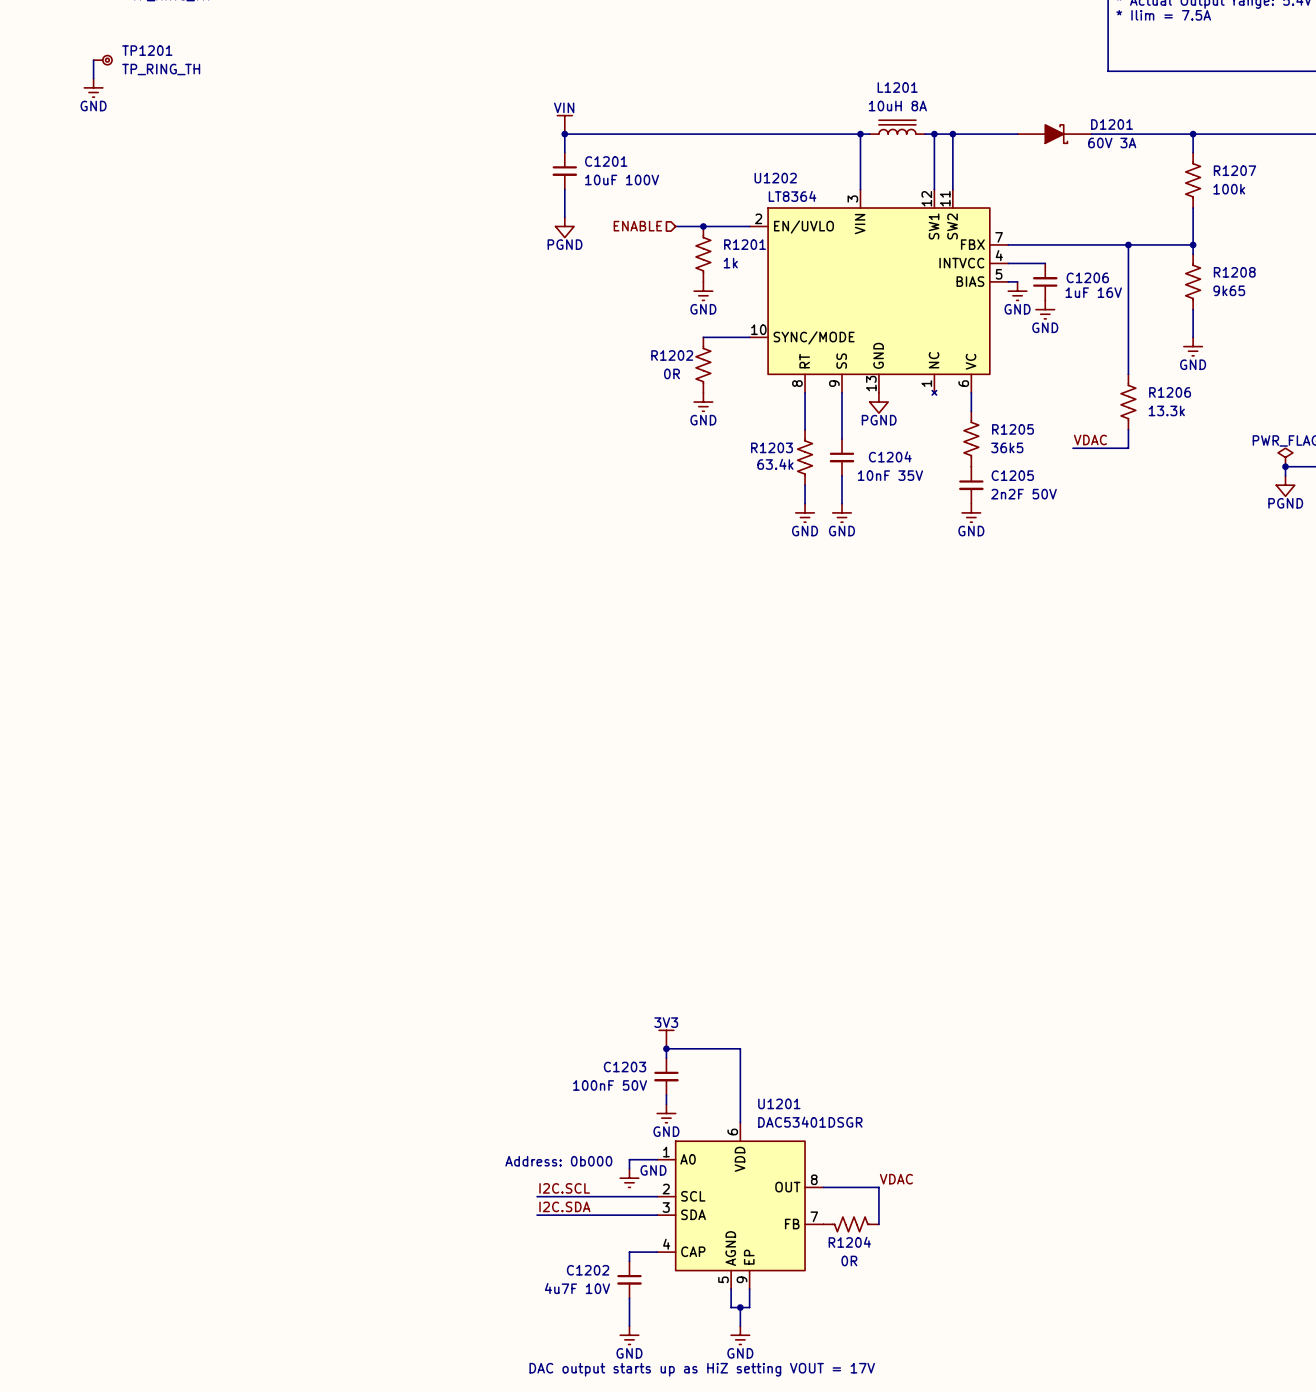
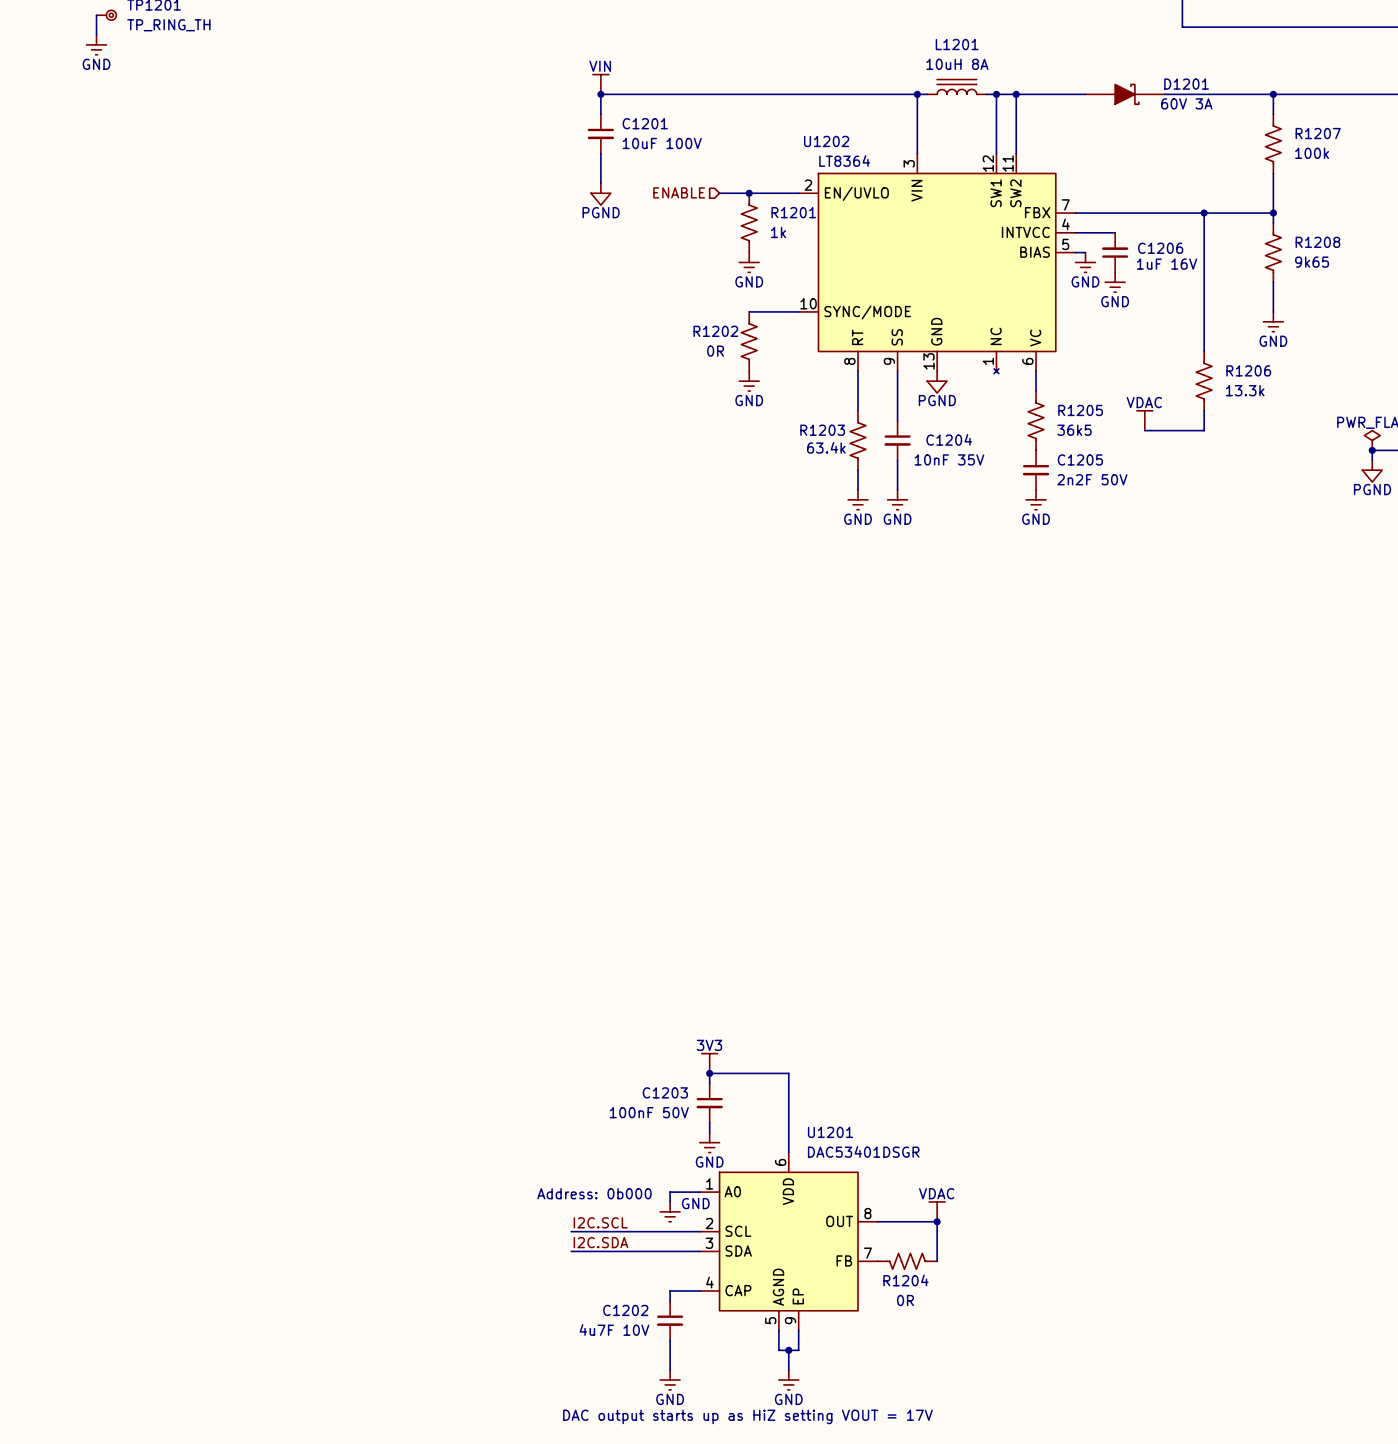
power symbol: none -> VDAC (1144, 420)
label: VDAC (1090, 439) -> none
power symbol: none -> VDAC (937, 1211)
label: VDAC (896, 1179) -> none
junction: none -> (937, 1221)

